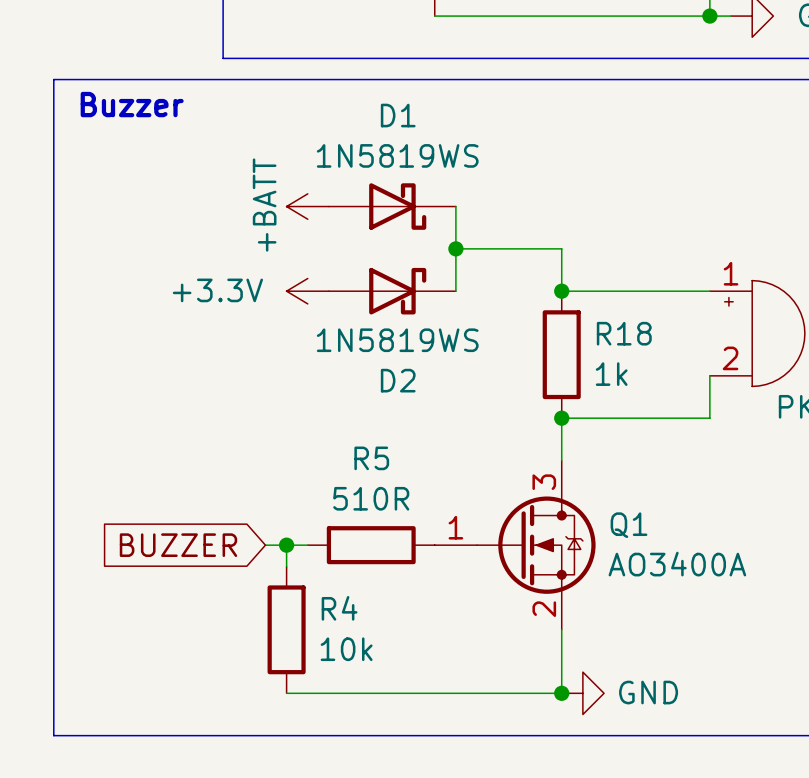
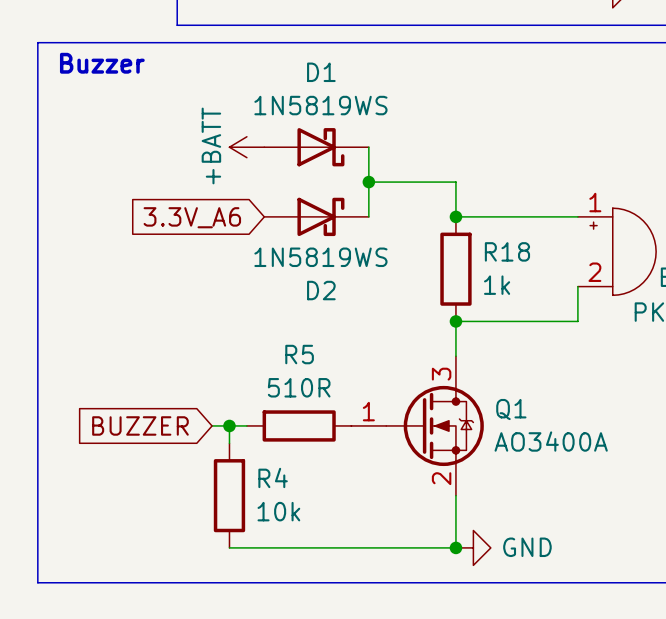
power symbol: +3.3V (307, 291) -> none
global label: none -> 3.3V_A6 (192, 217)

